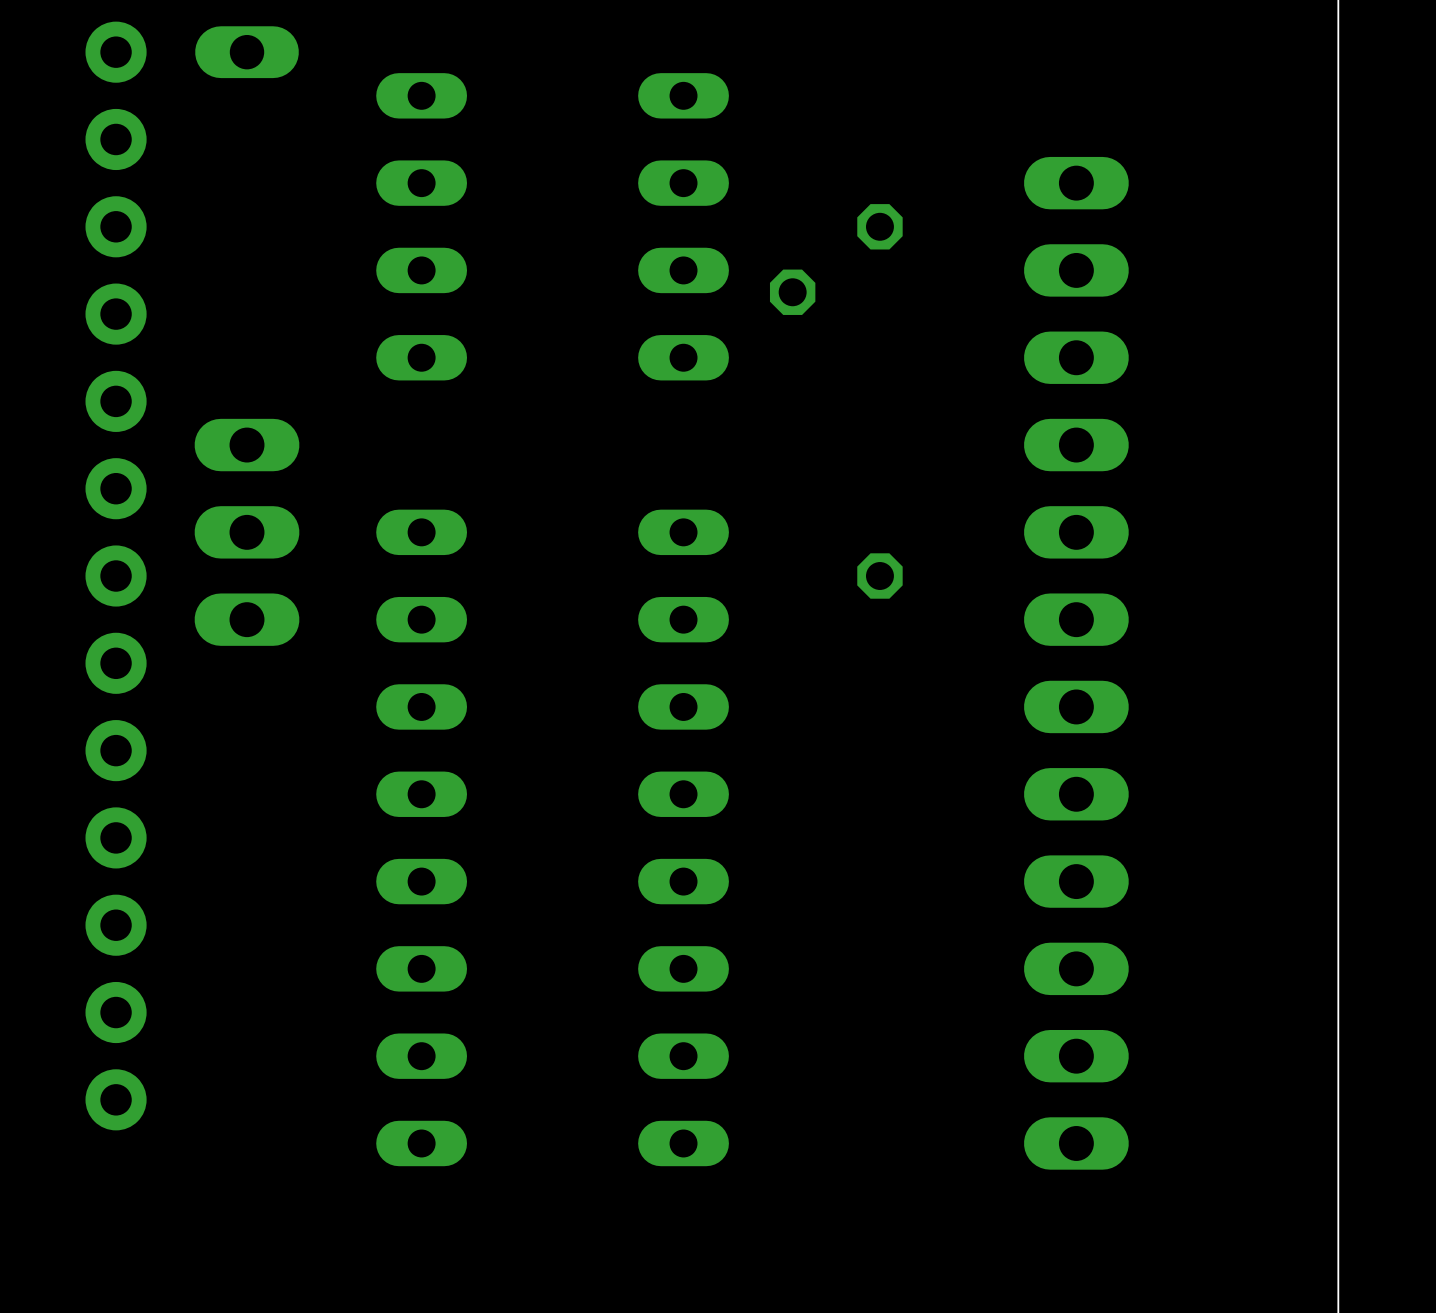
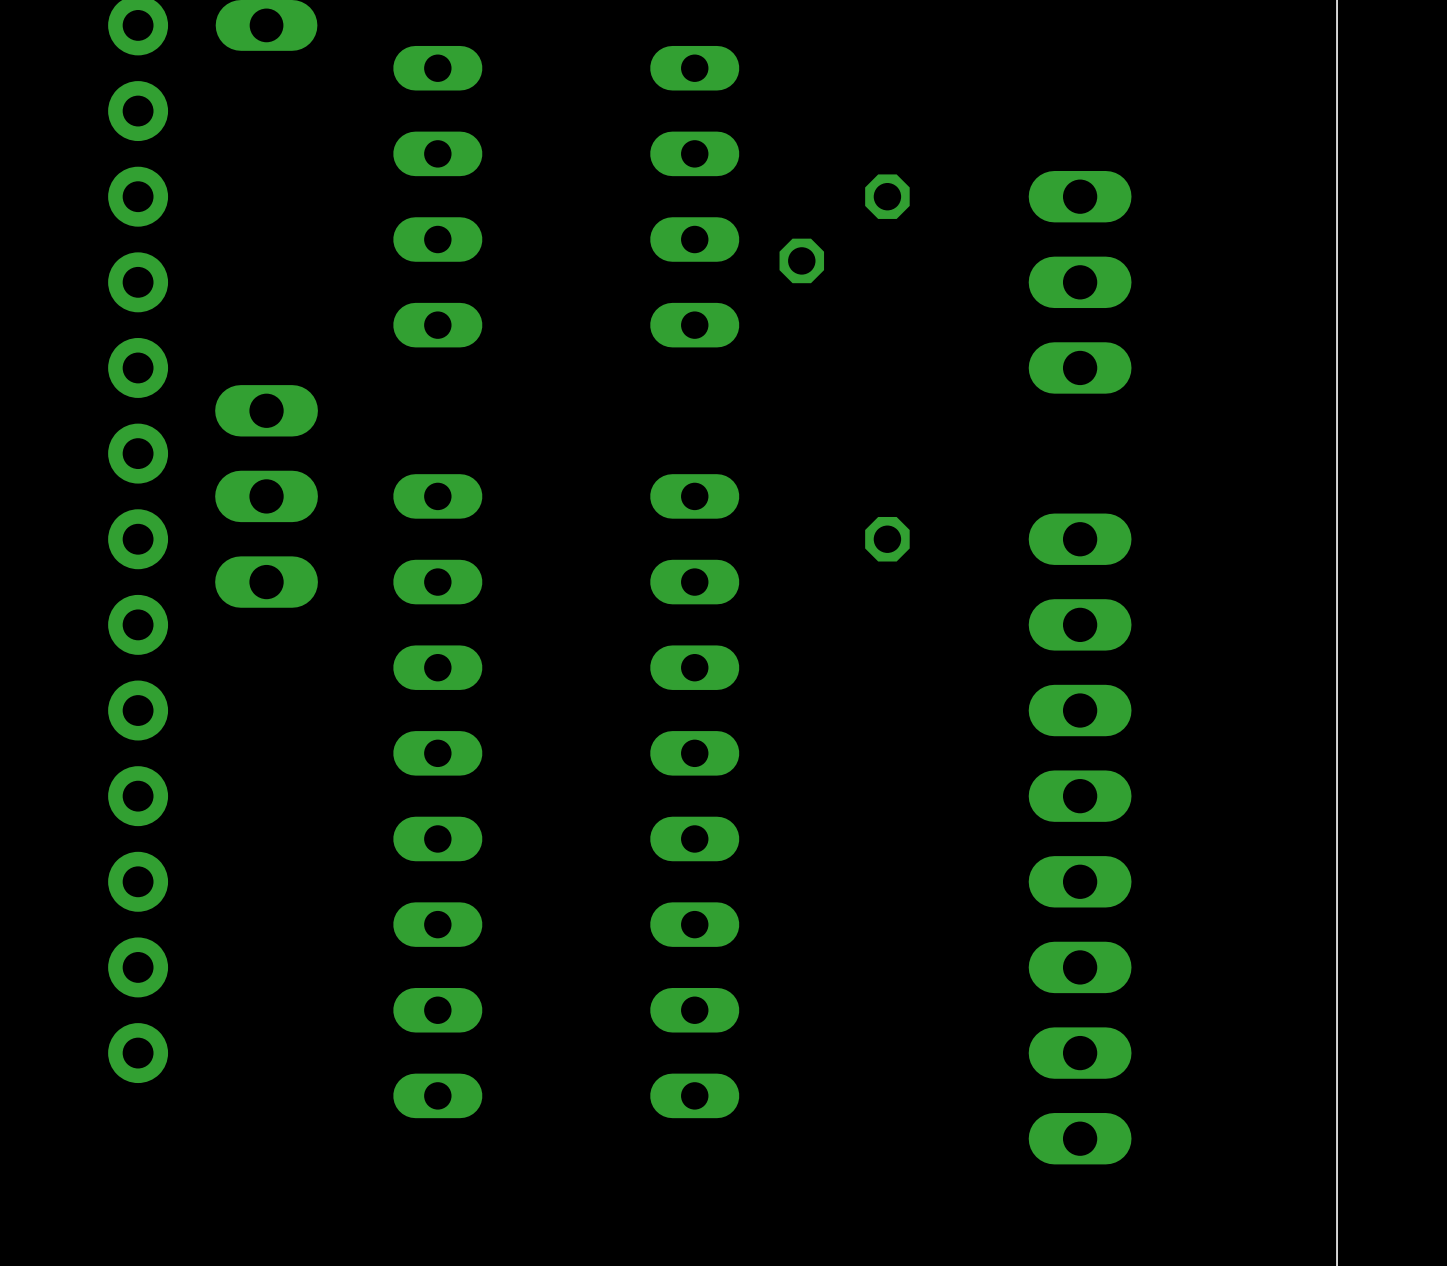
part position: (1076, 270) -> (1080, 282)
part: (1076, 794) -> none
part: none -> (1080, 838)

